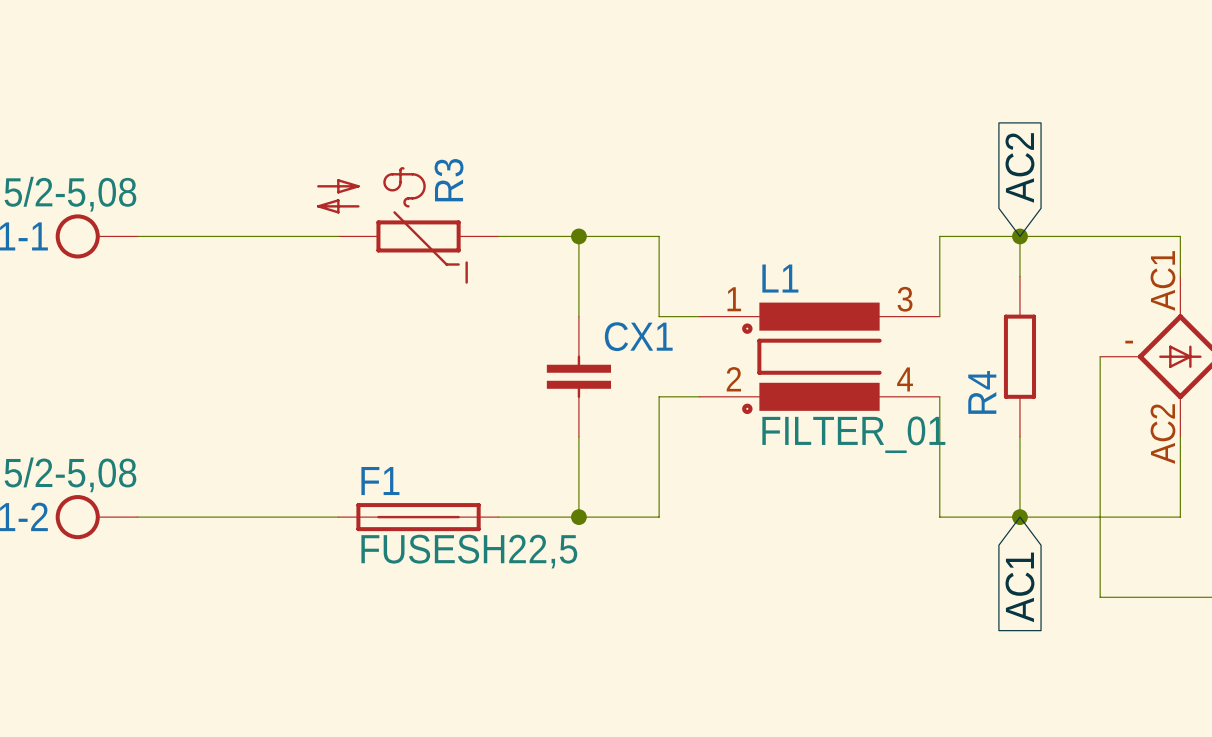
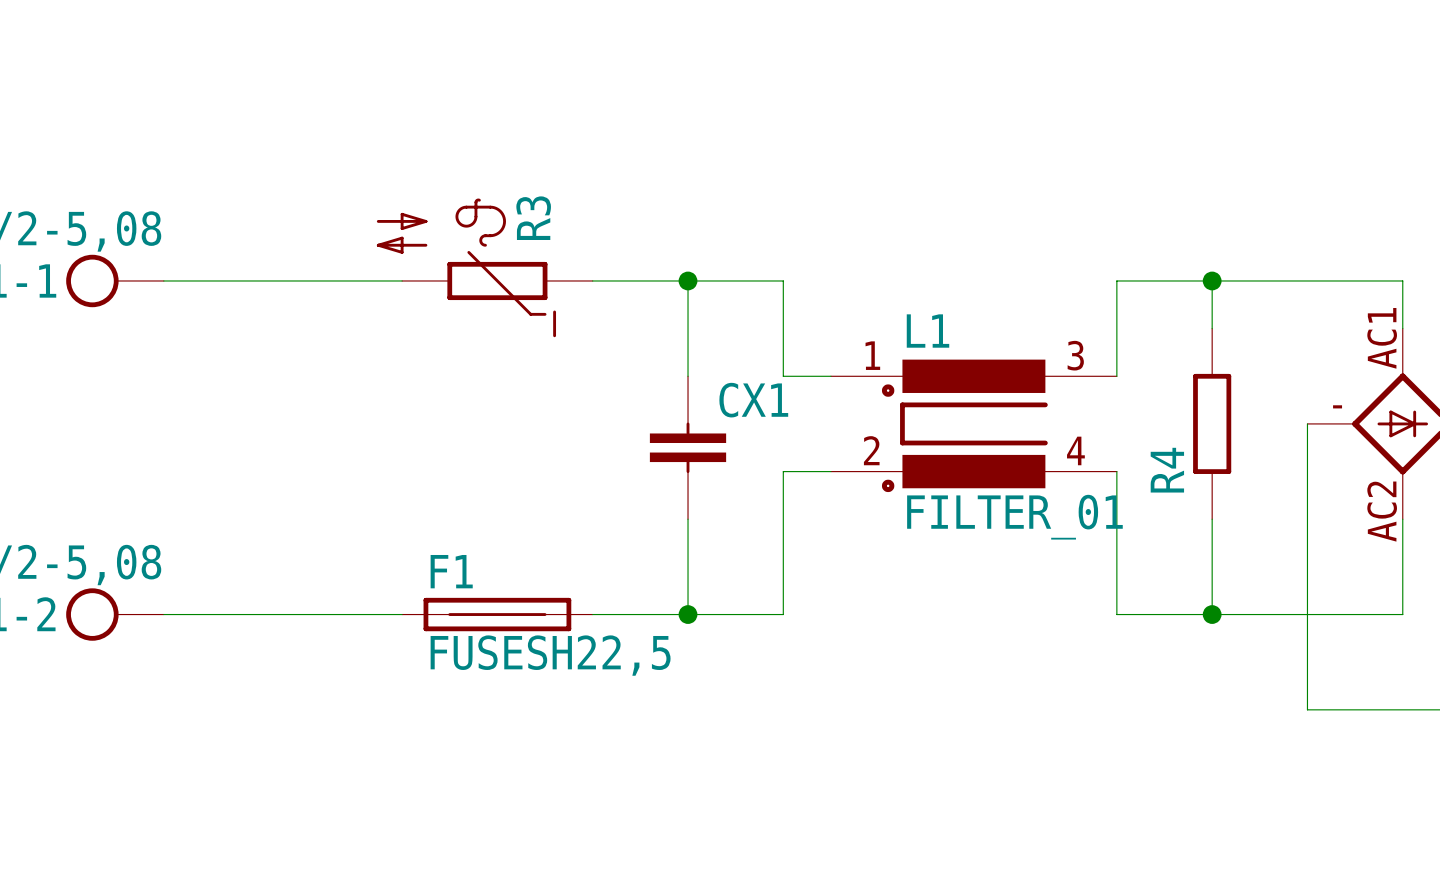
global label: AC2 (1019, 167) -> none
global label: AC1 (1019, 587) -> none

